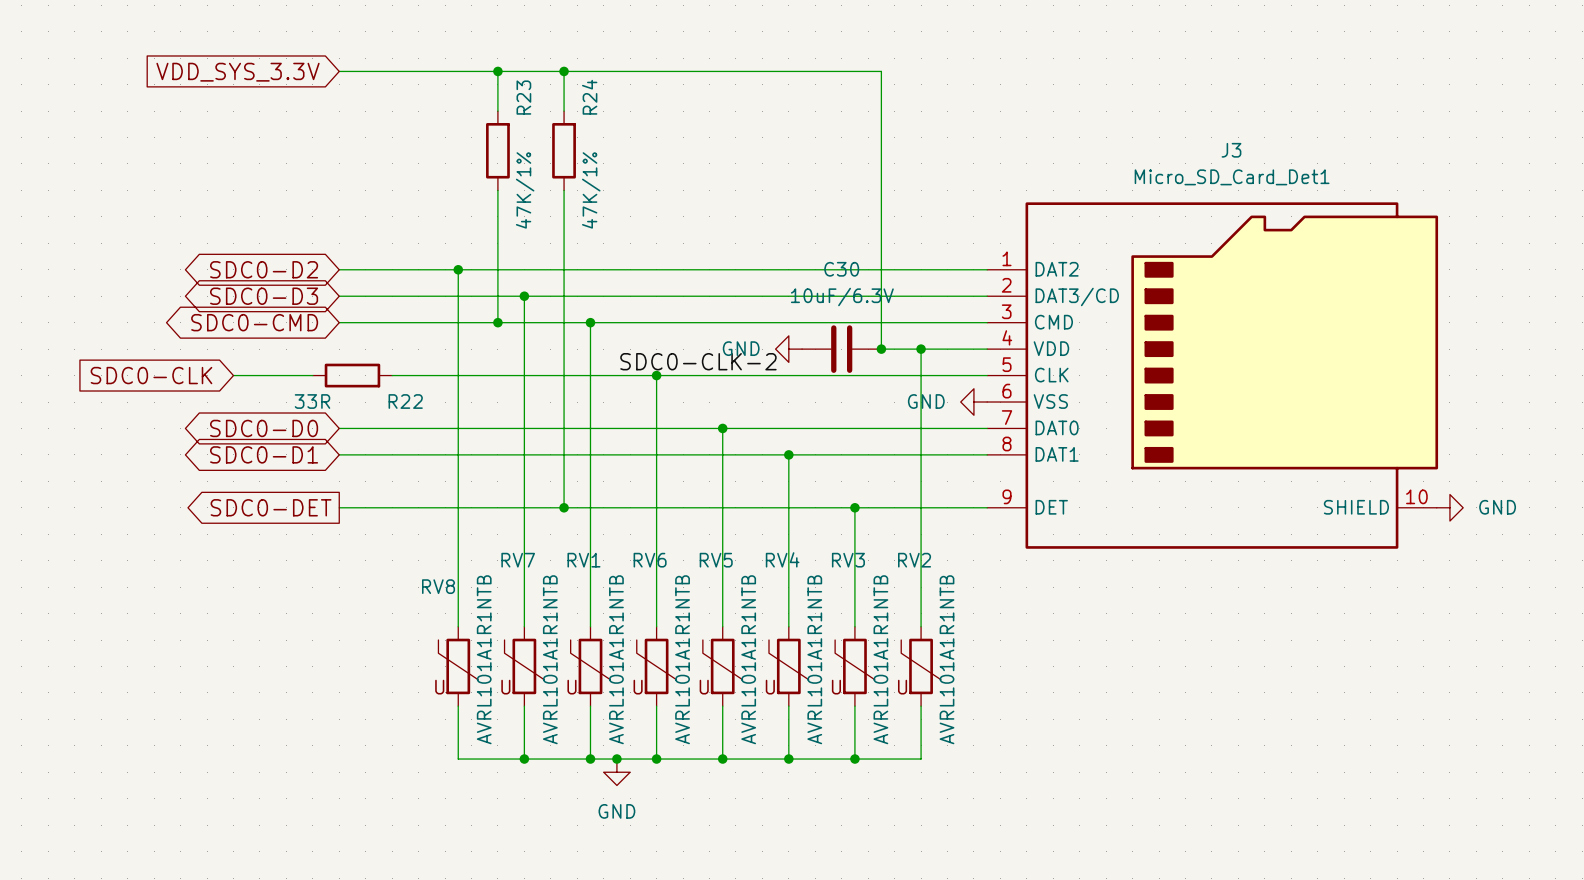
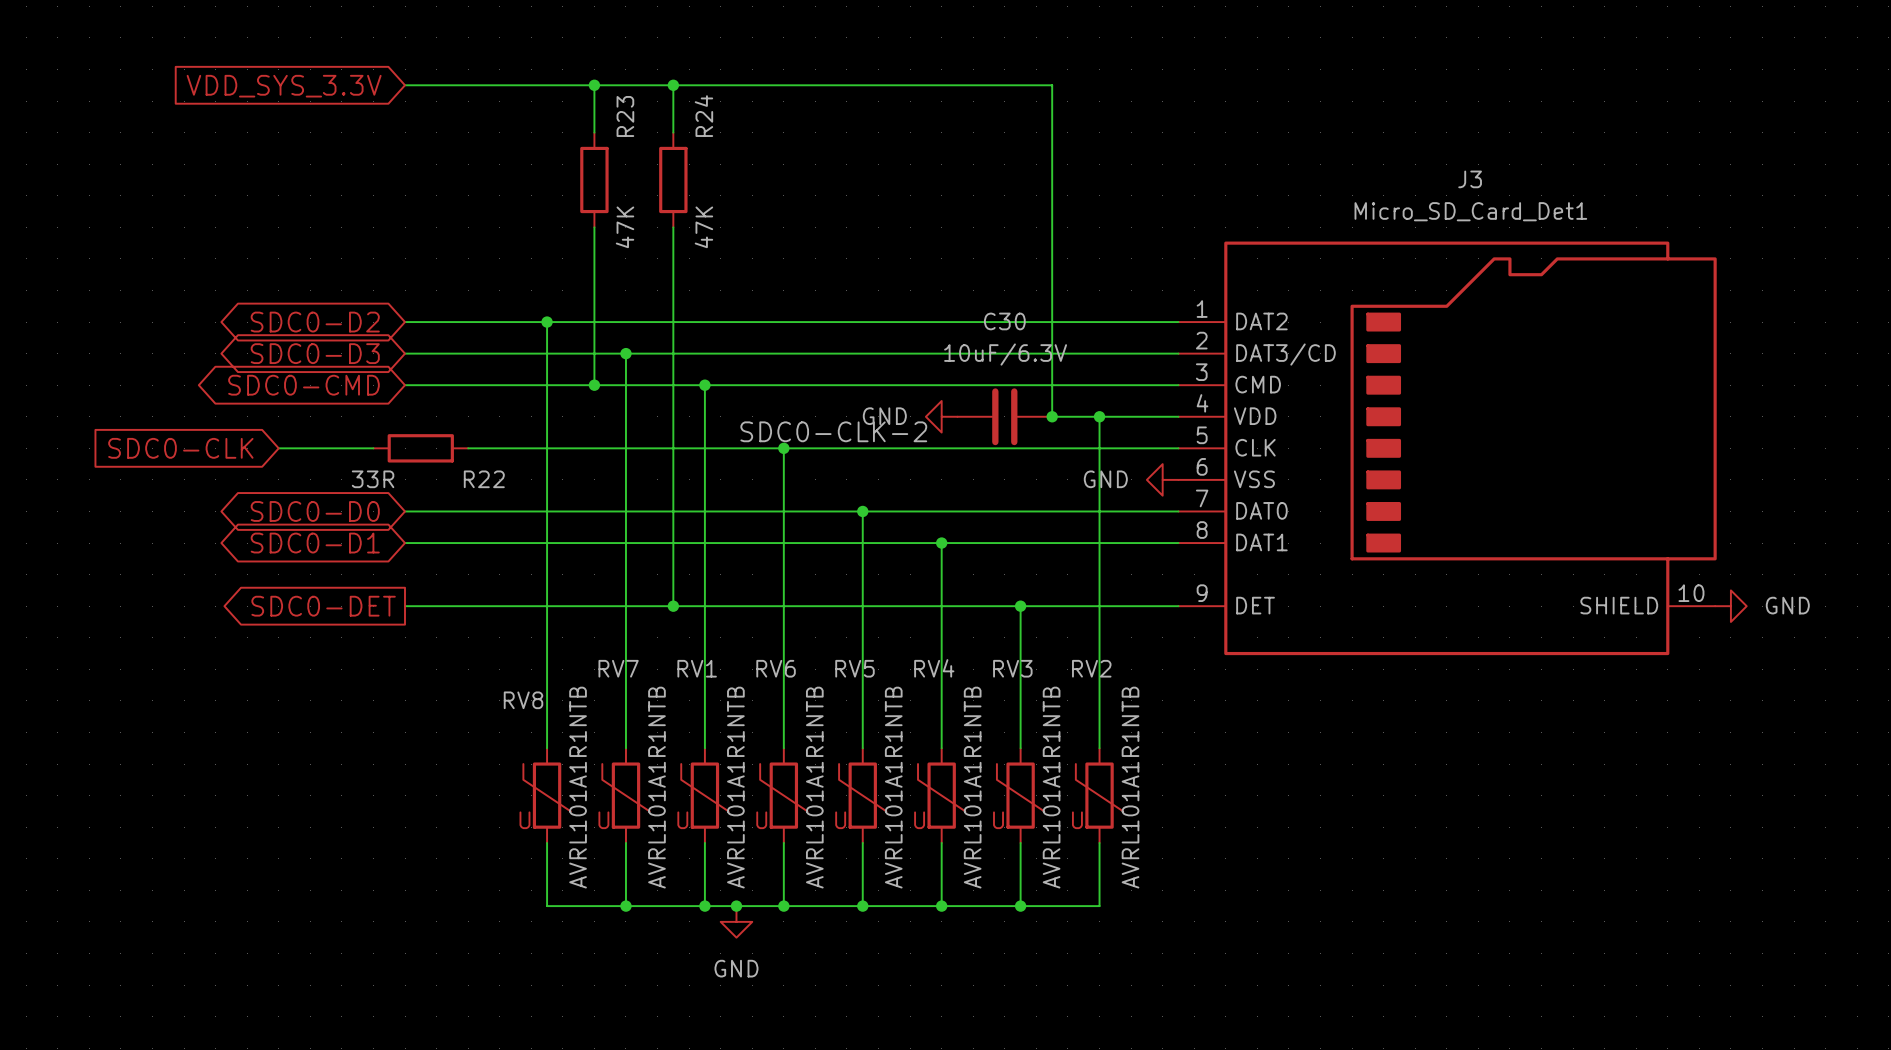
R23 value: 47K/1% (525, 190) -> 47K (625, 227)
R24 value: 47K/1% (591, 190) -> 47K (703, 227)

